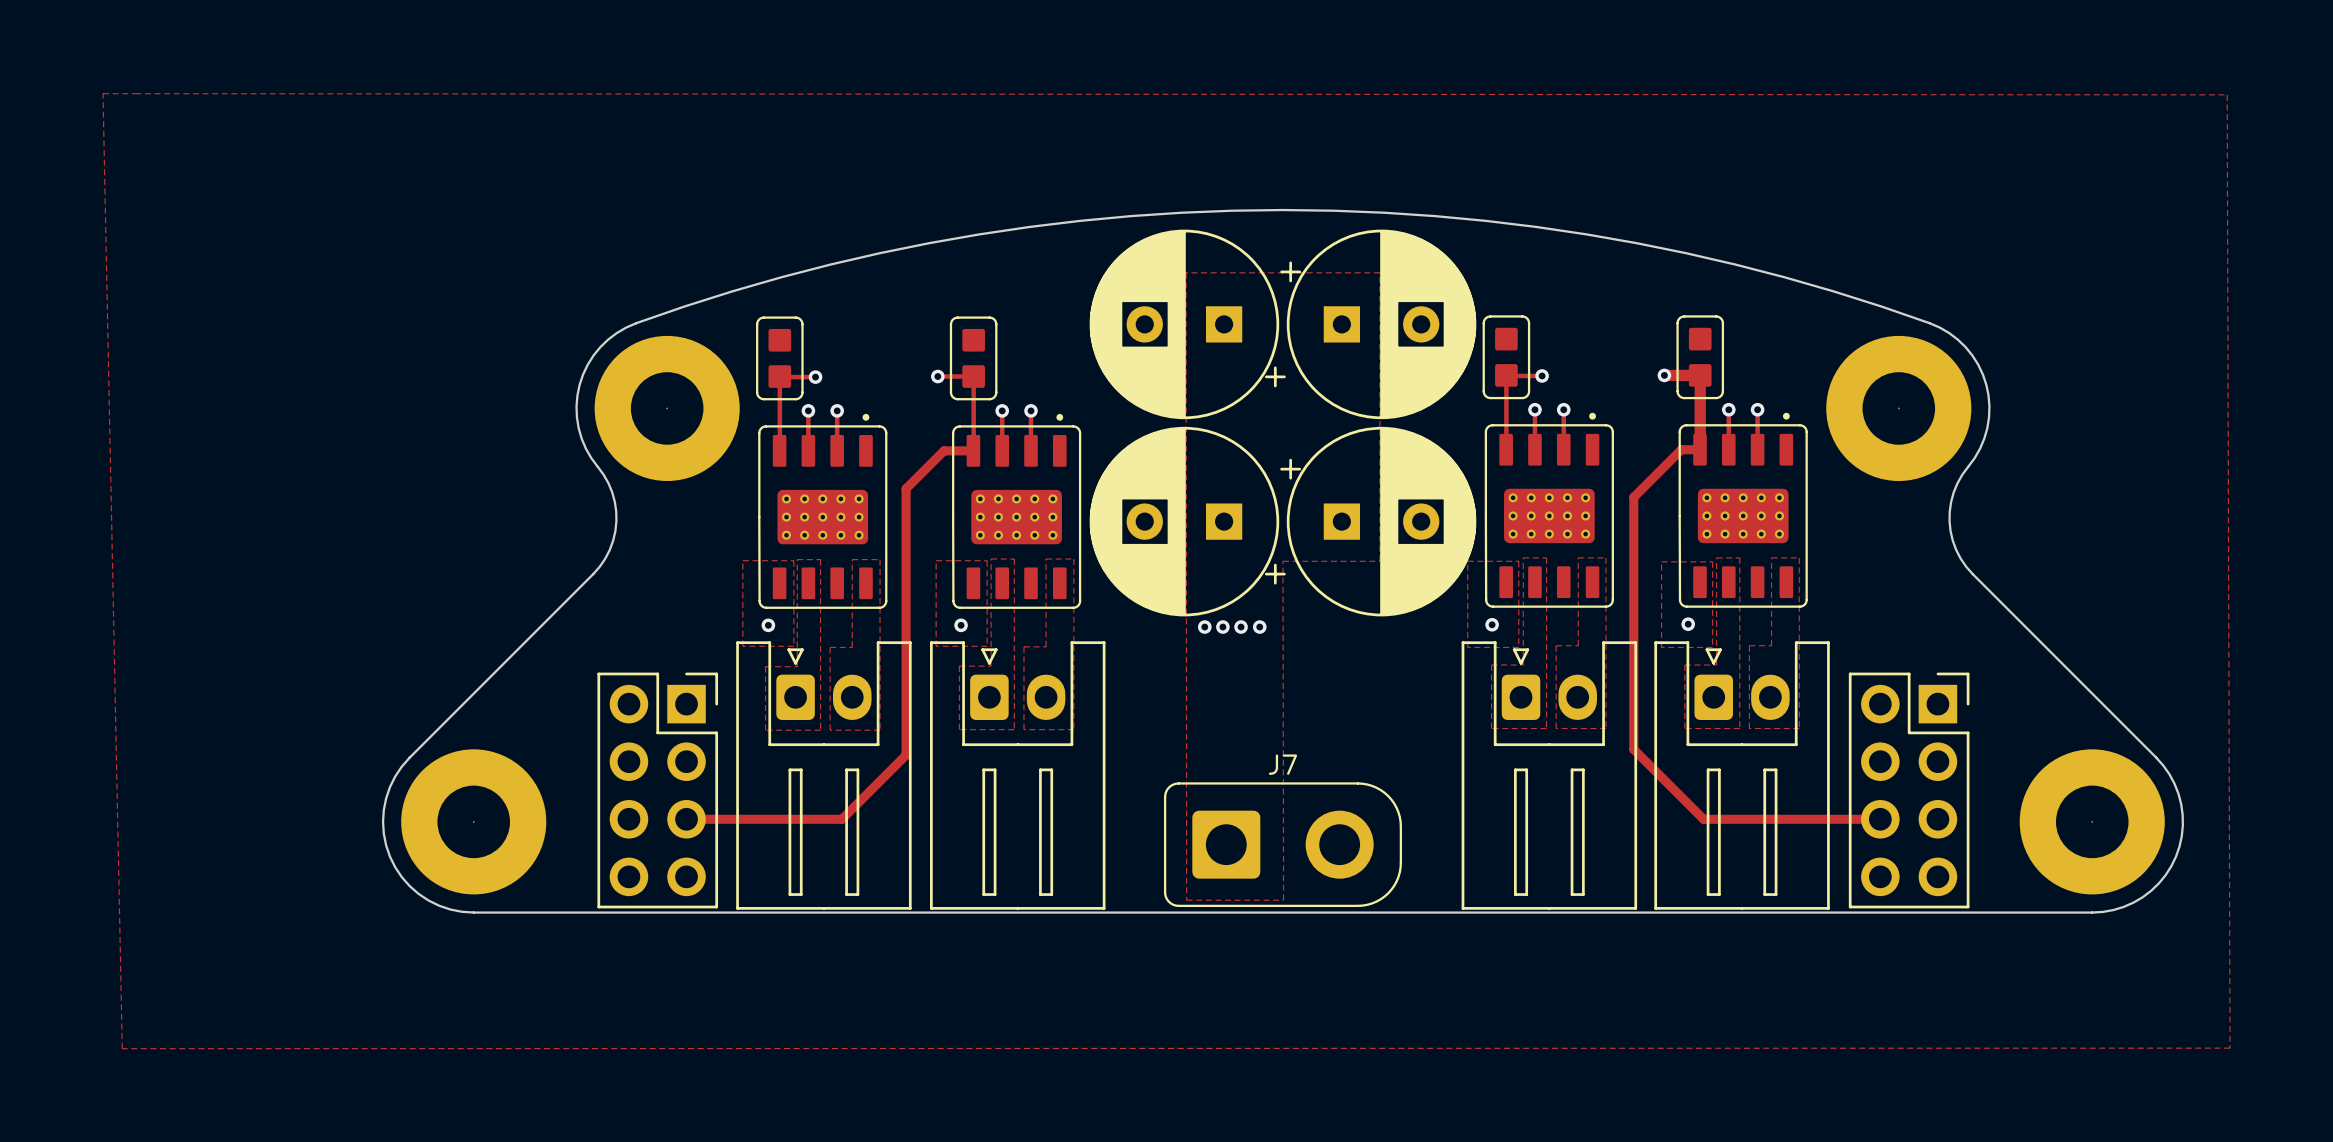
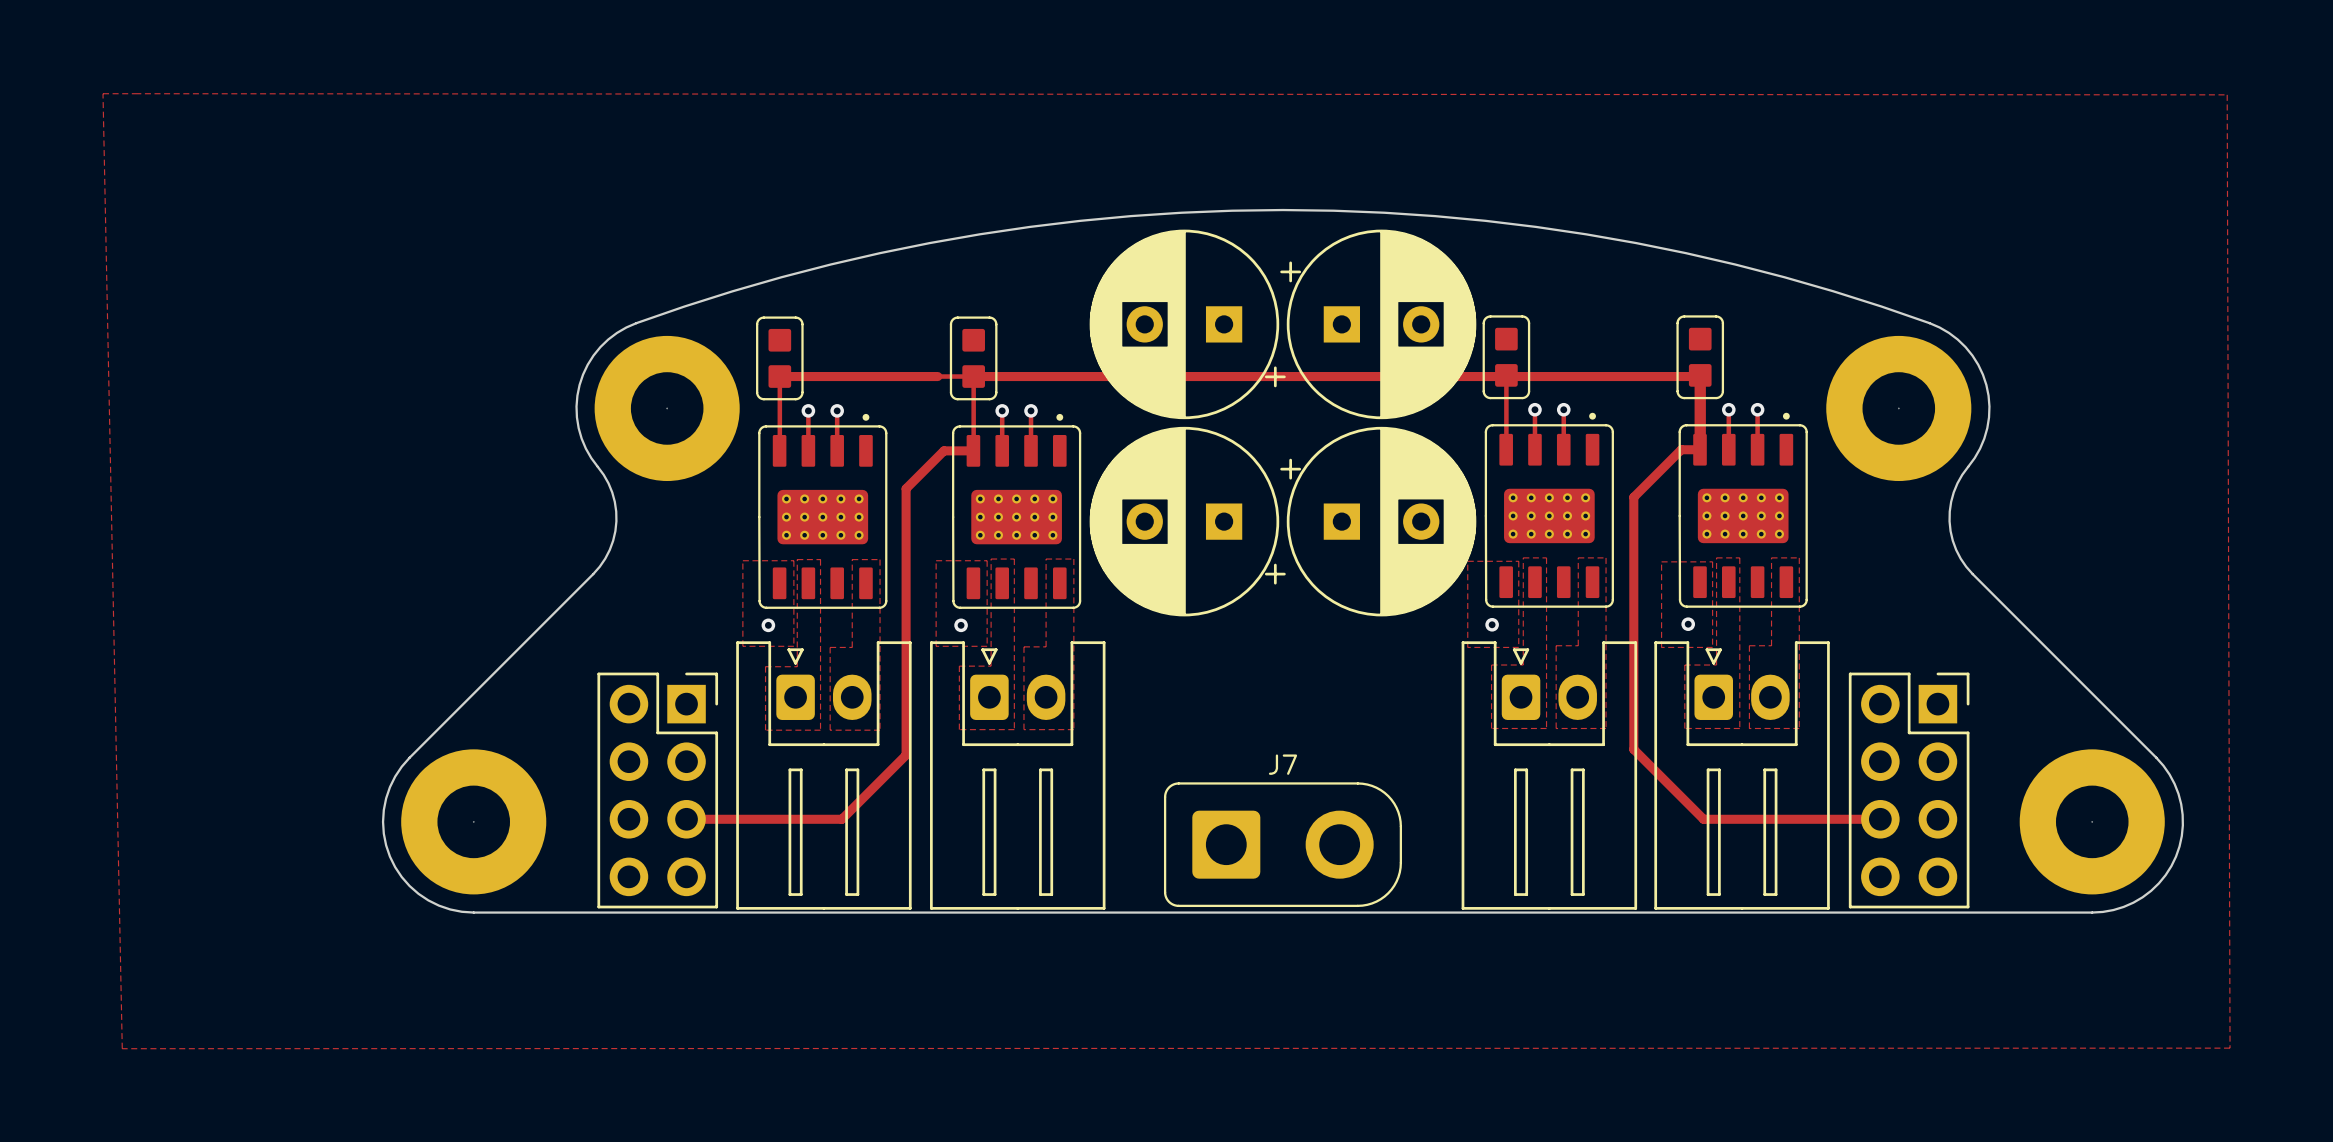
zone outline: (1186, 272) (1379, 272) (1379, 561) (1282, 561) (1283, 900) (1186, 900) (1186, 272) -> none
via: (1542, 375) -> none
via: (1664, 375) -> none
track: (1666, 375) (1664, 375) (1693, 375) -> (973, 376) (1693, 375)
via: (937, 376) -> none
track: (779, 377) (815, 377) -> (779, 376) (937, 376)
via: (815, 377) -> none
via: (1204, 627) -> none
via: (1222, 627) -> none
via: (1241, 627) -> none
via: (1259, 627) -> none

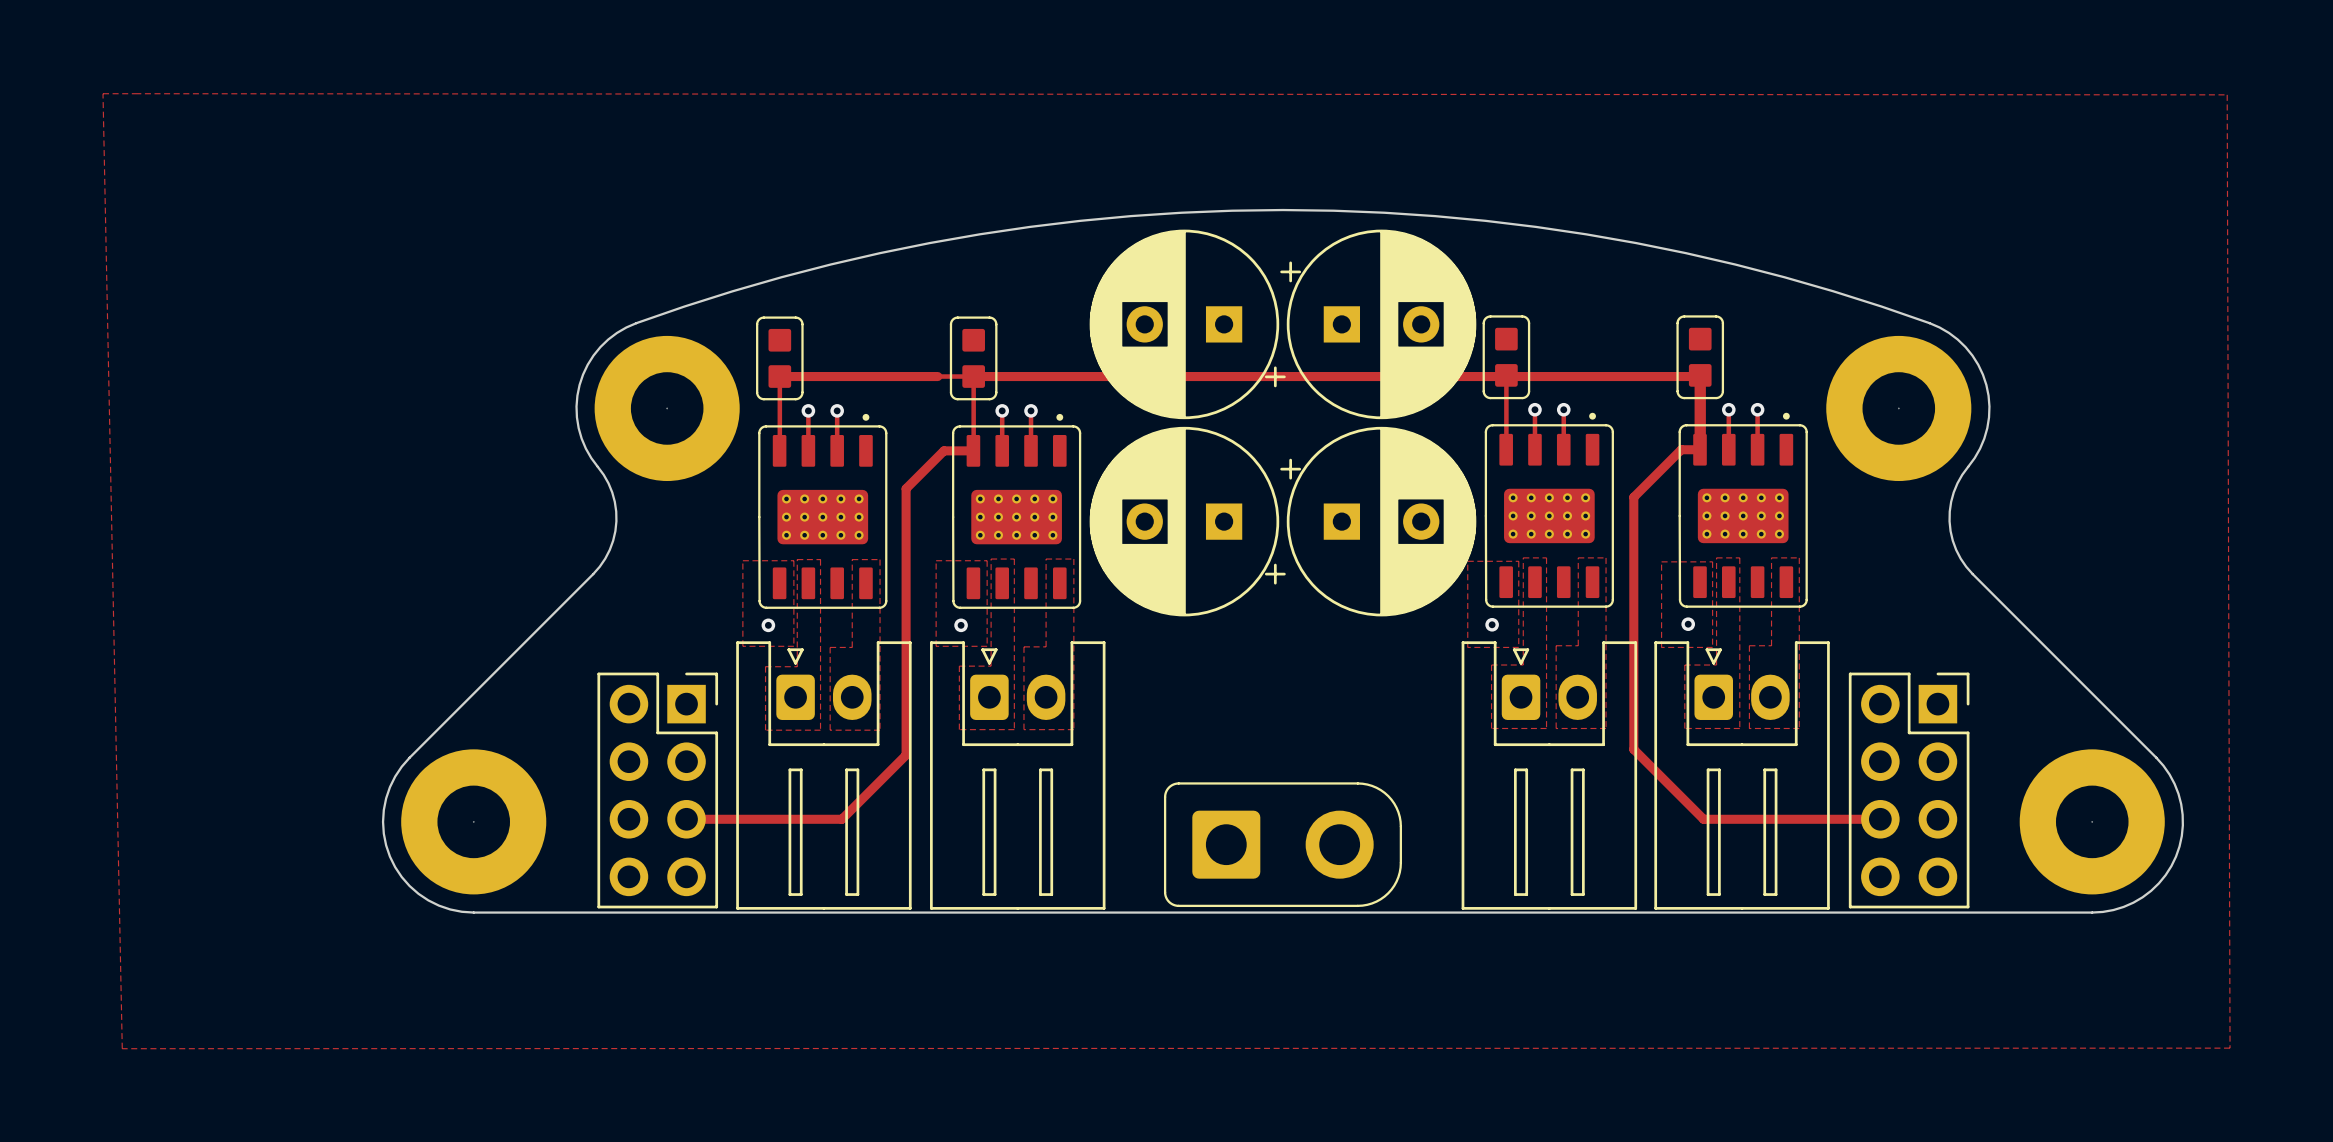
J7 name: J7 (1282, 764) -> none

